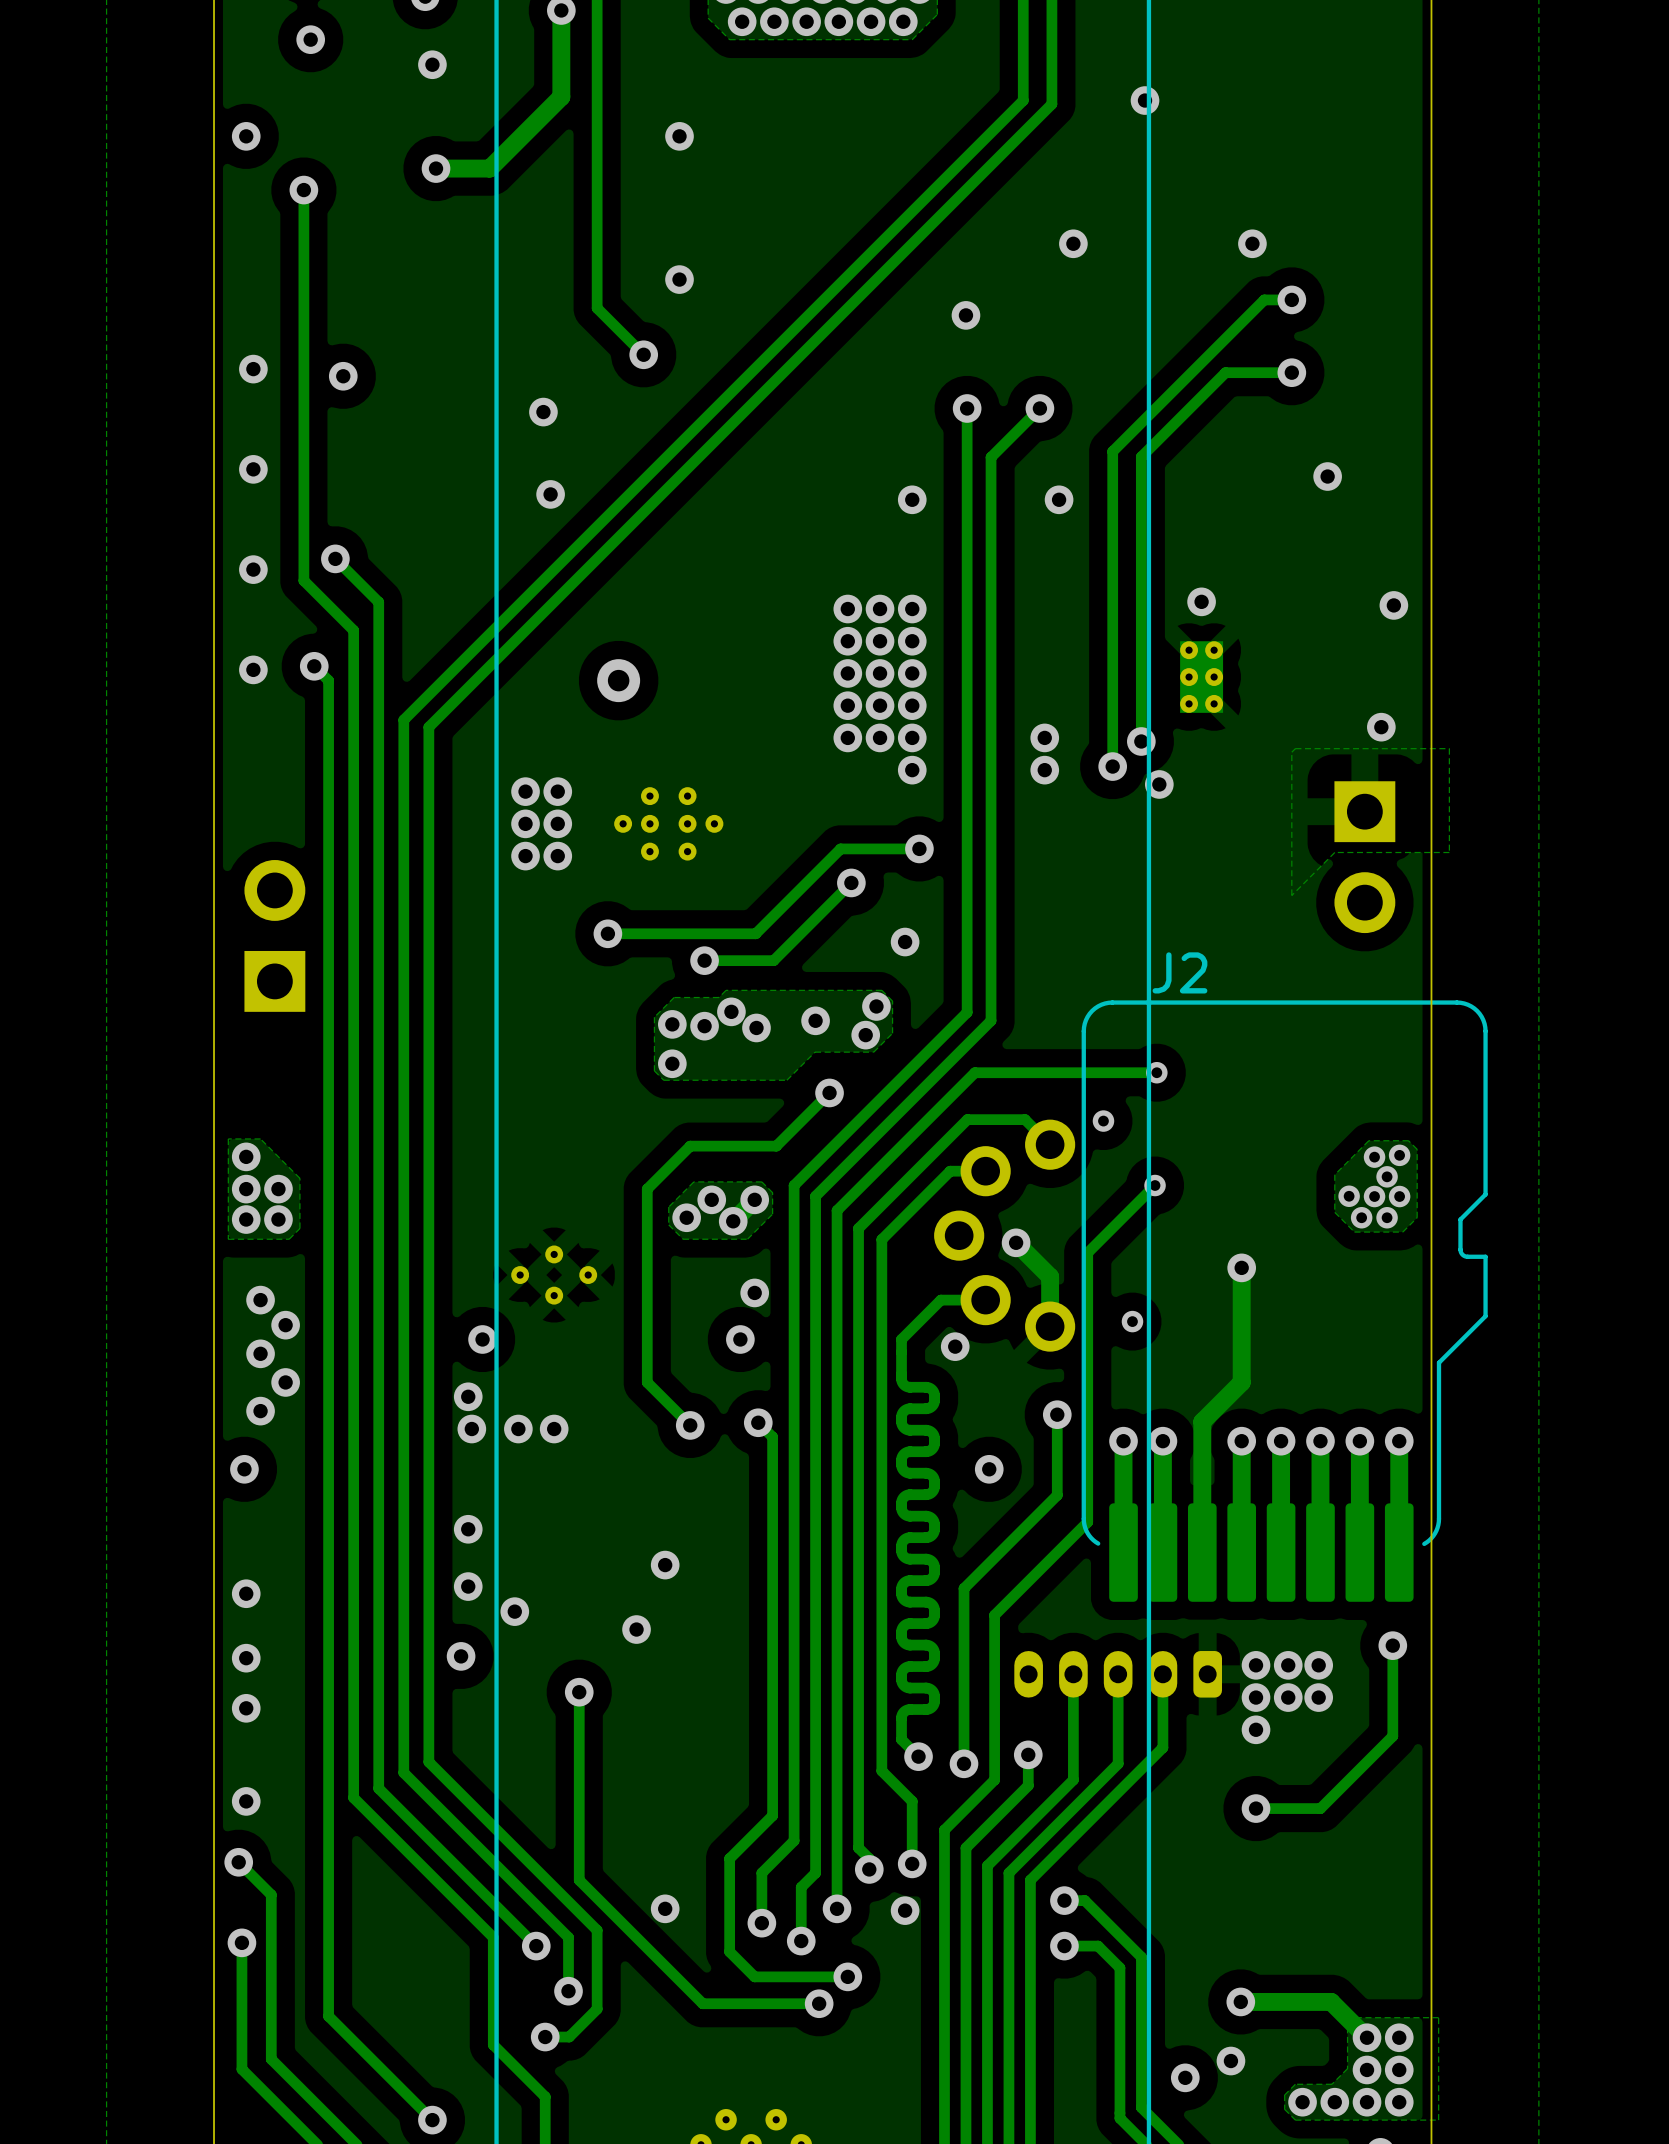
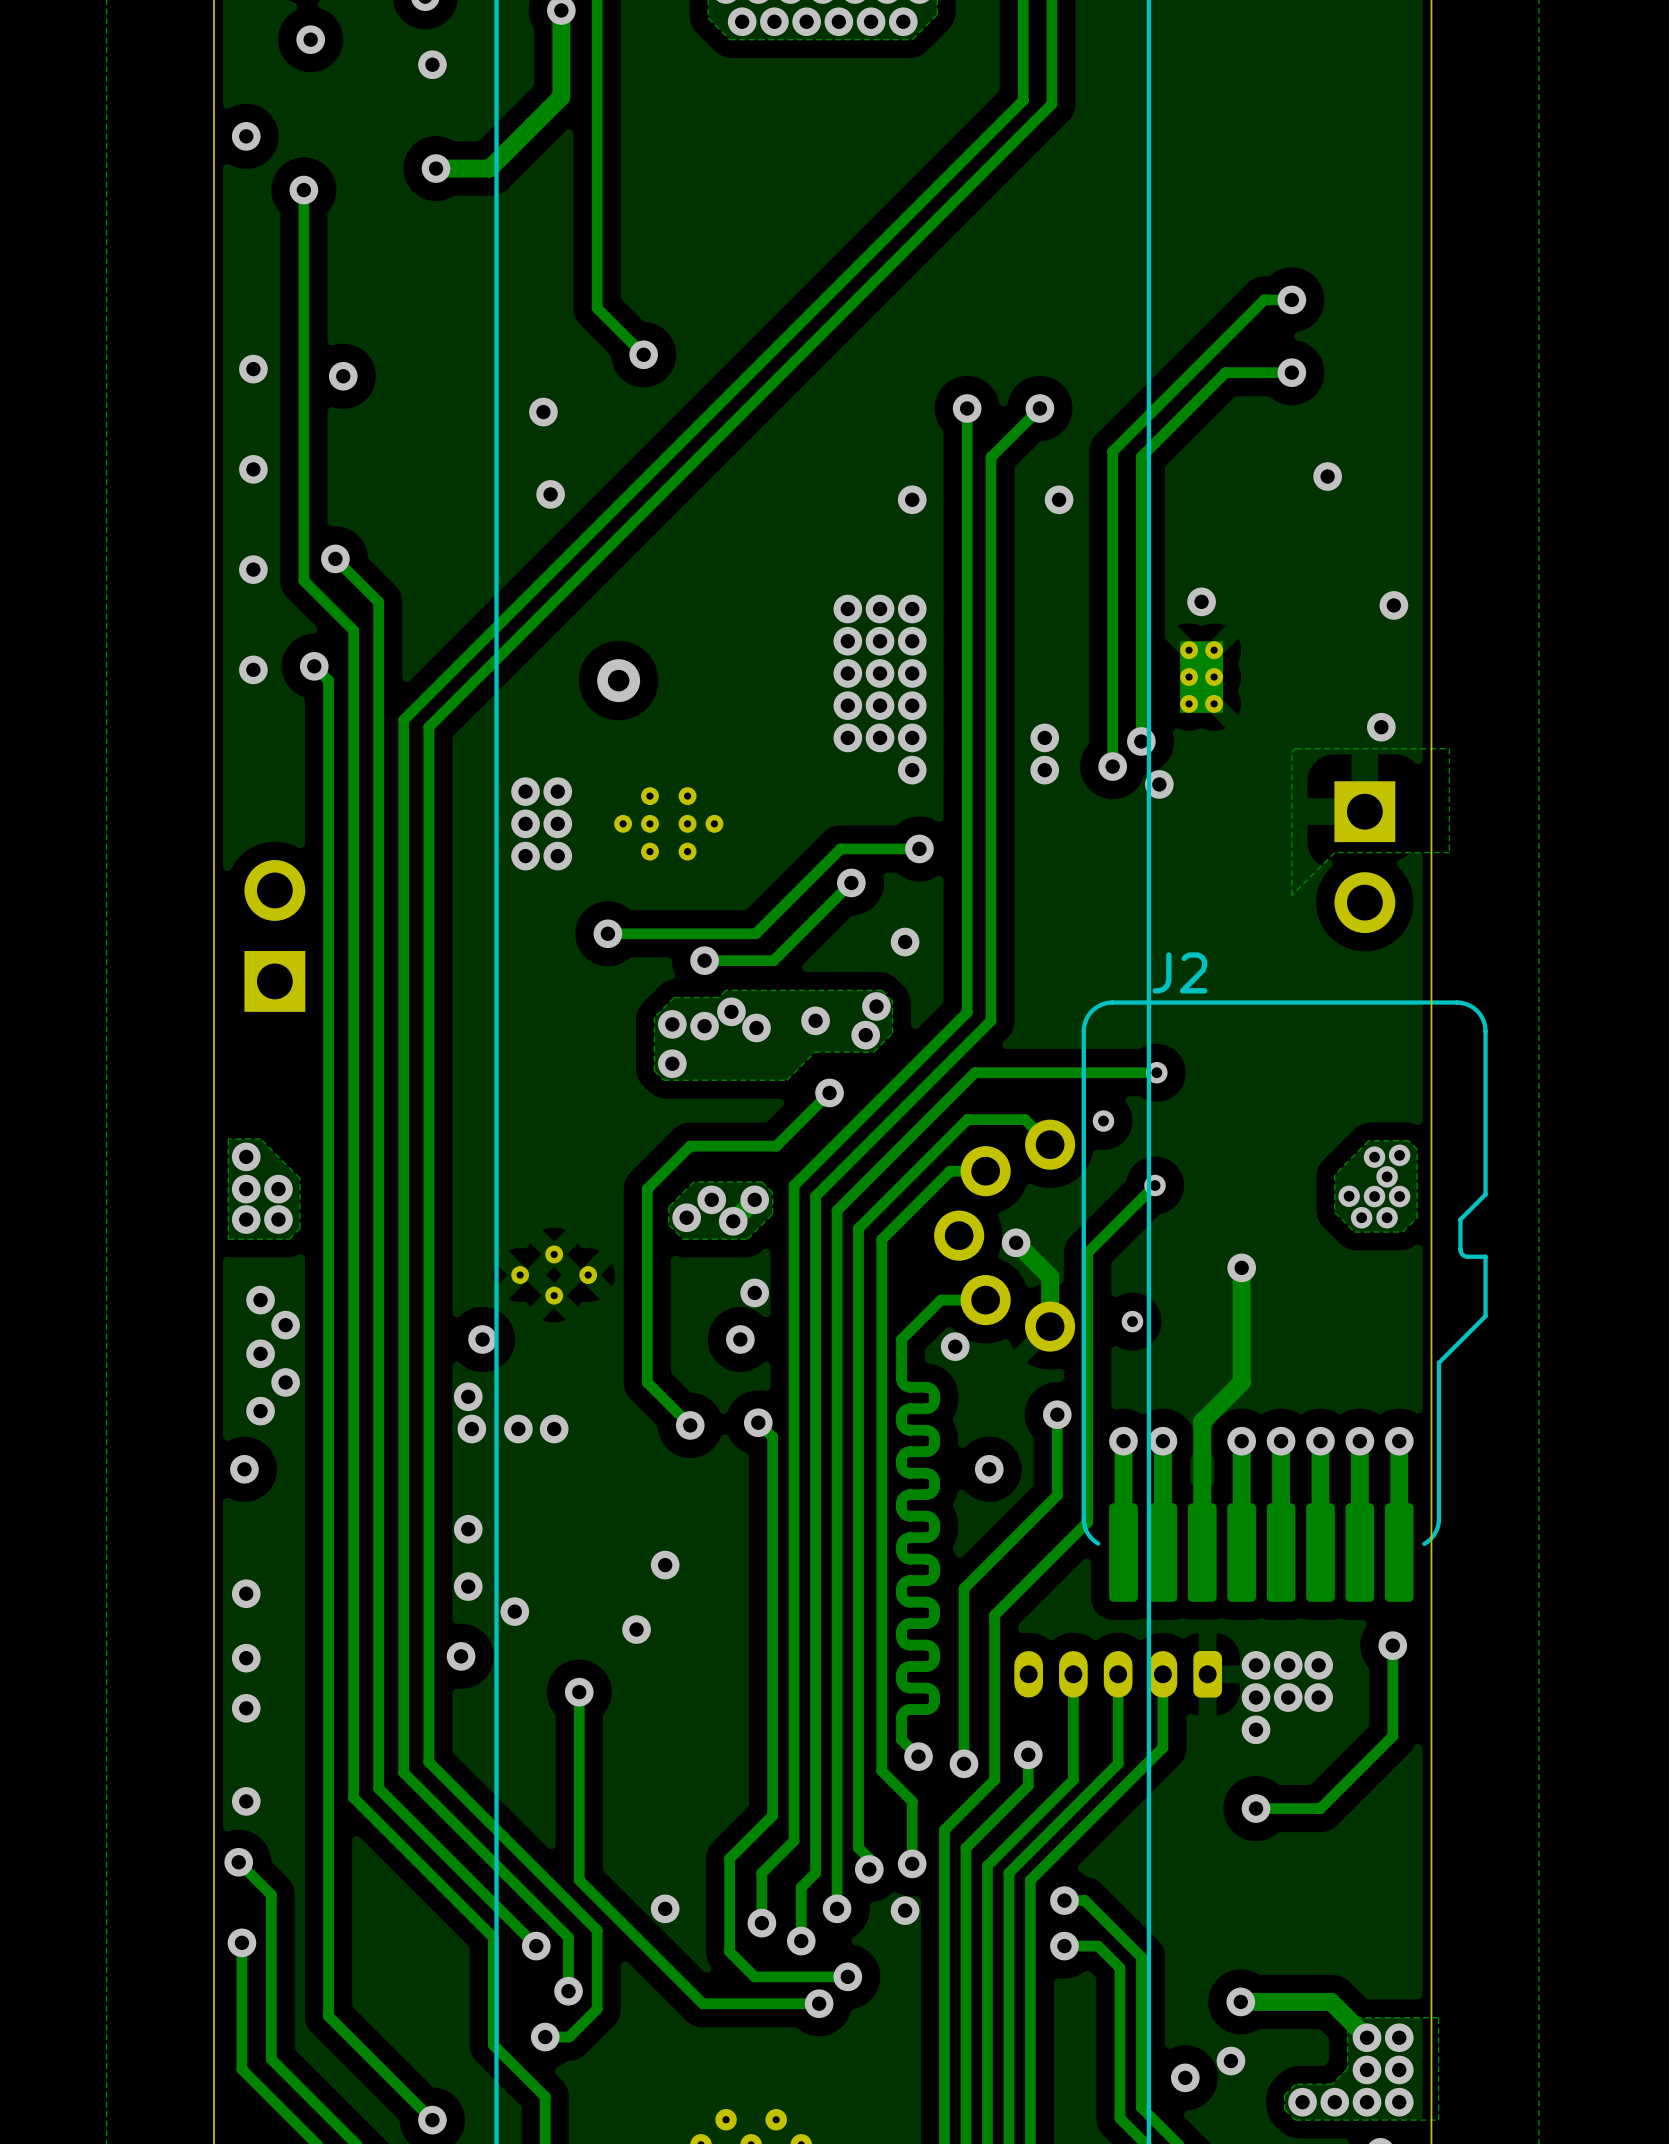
via: (1145, 100) -> none
via: (679, 136) -> none
via: (1073, 243) -> none
via: (1252, 243) -> none
via: (679, 279) -> none
via: (965, 315) -> none

